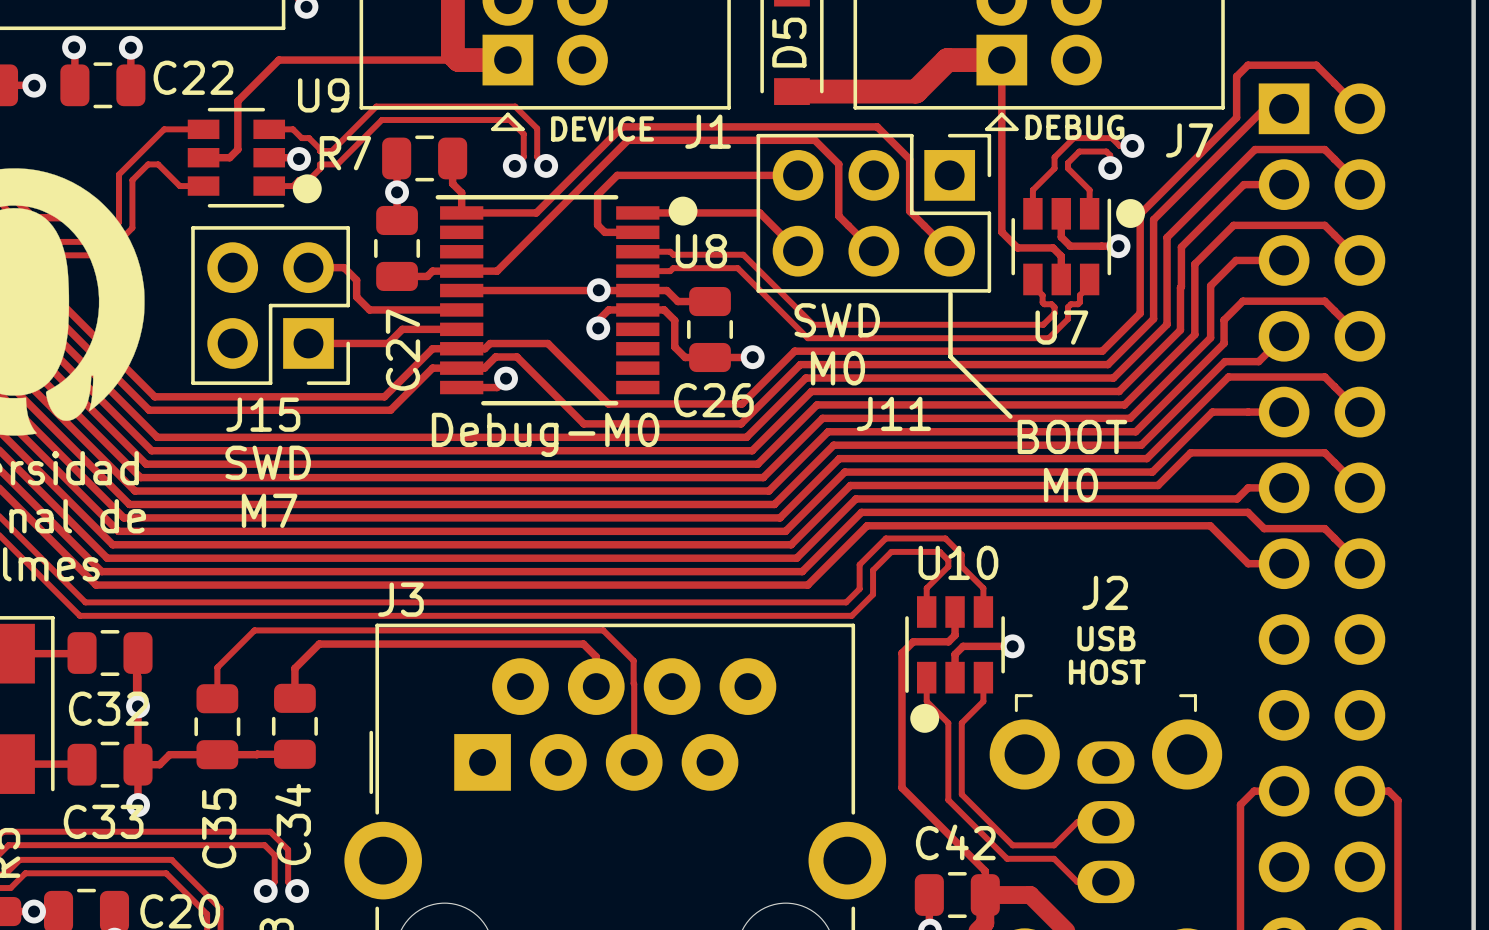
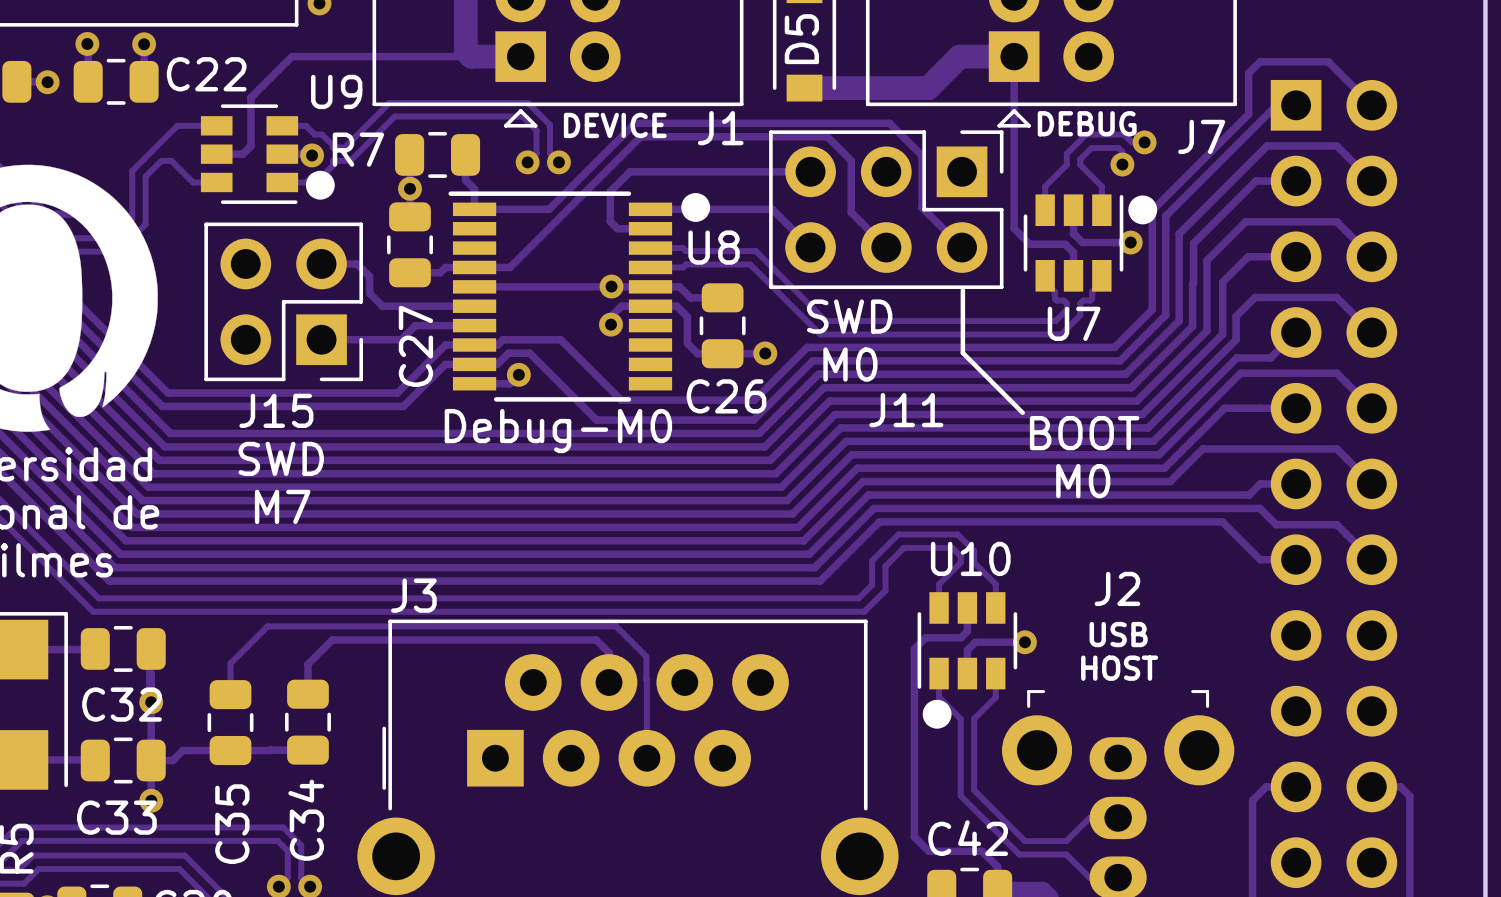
track: (901, 787) (969, 855) -> (914, 783) (914, 836) (928, 851) (982, 851)

